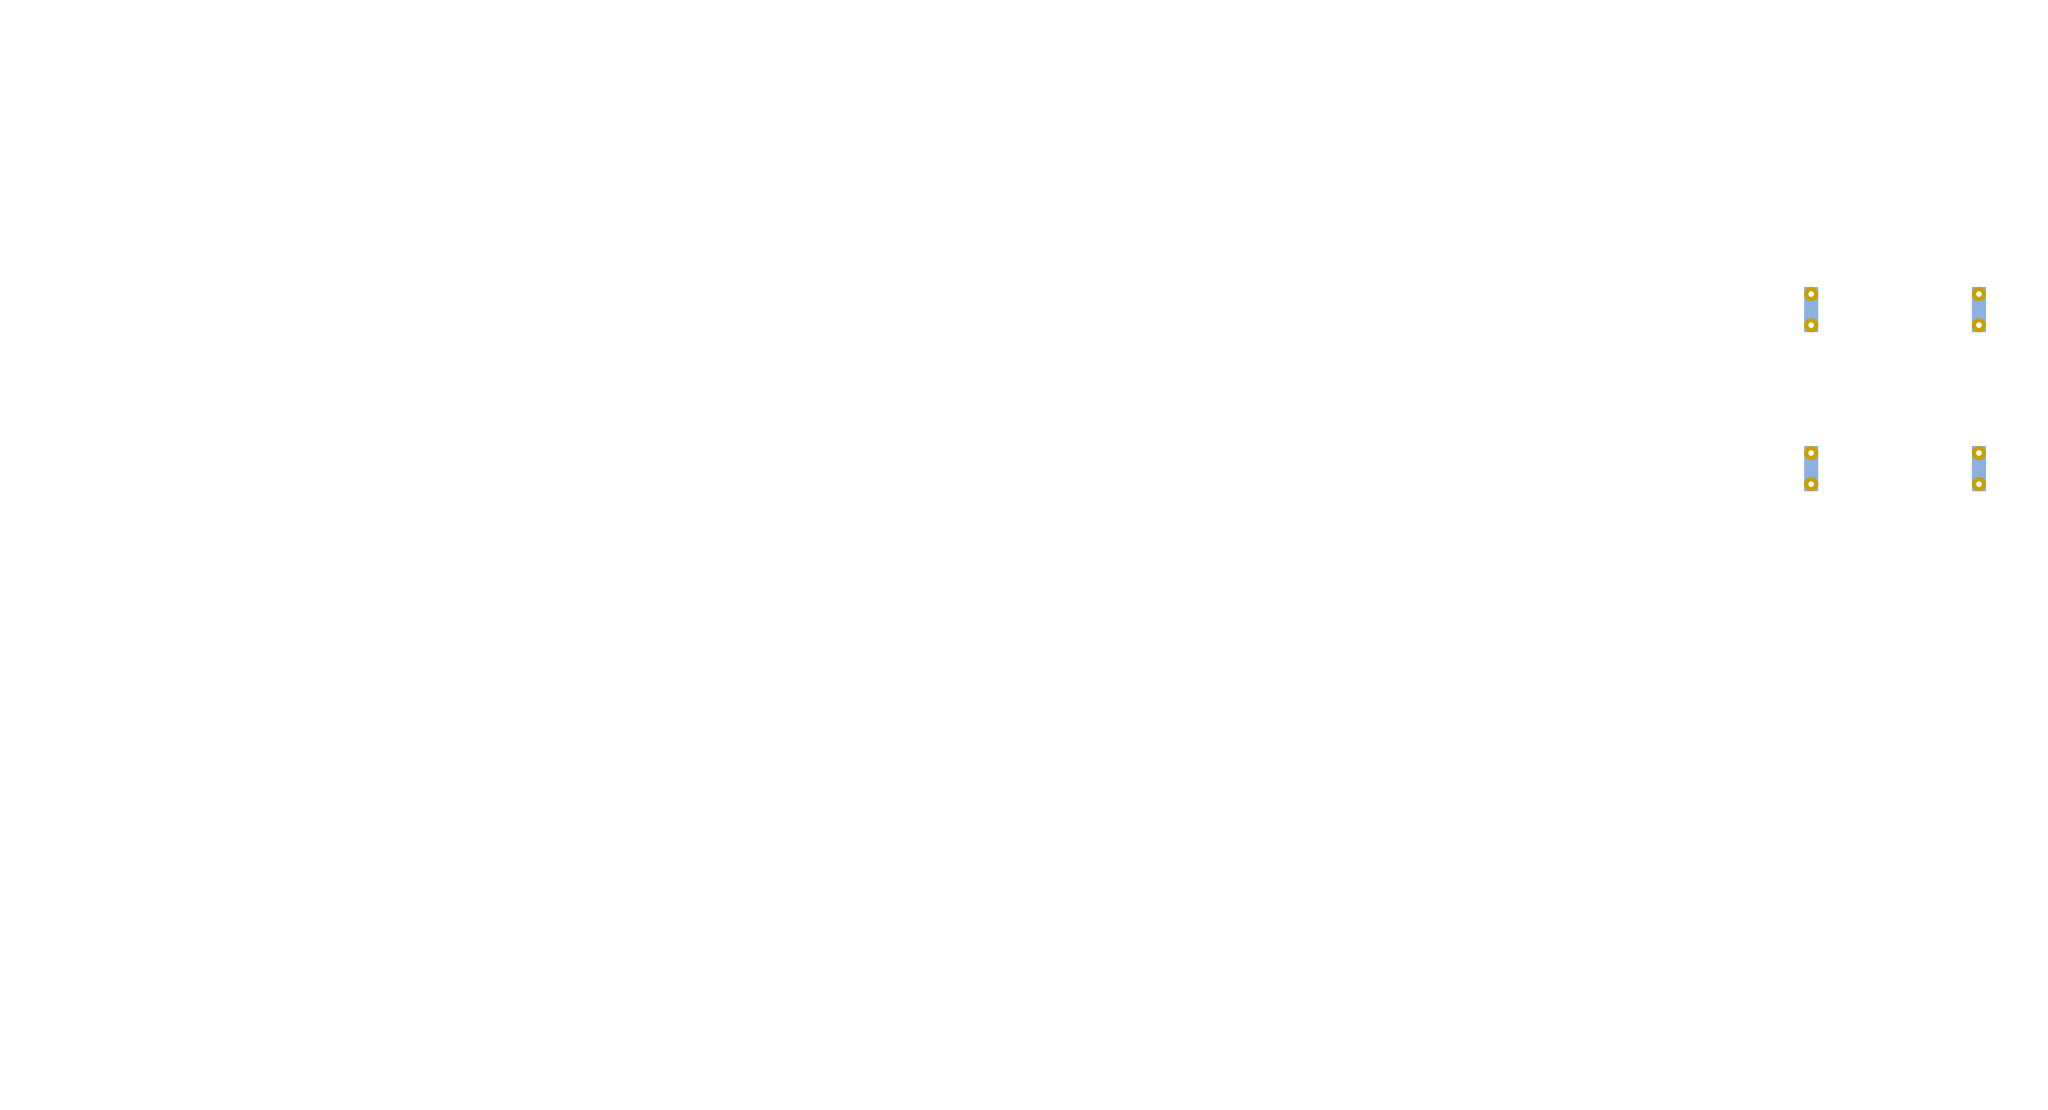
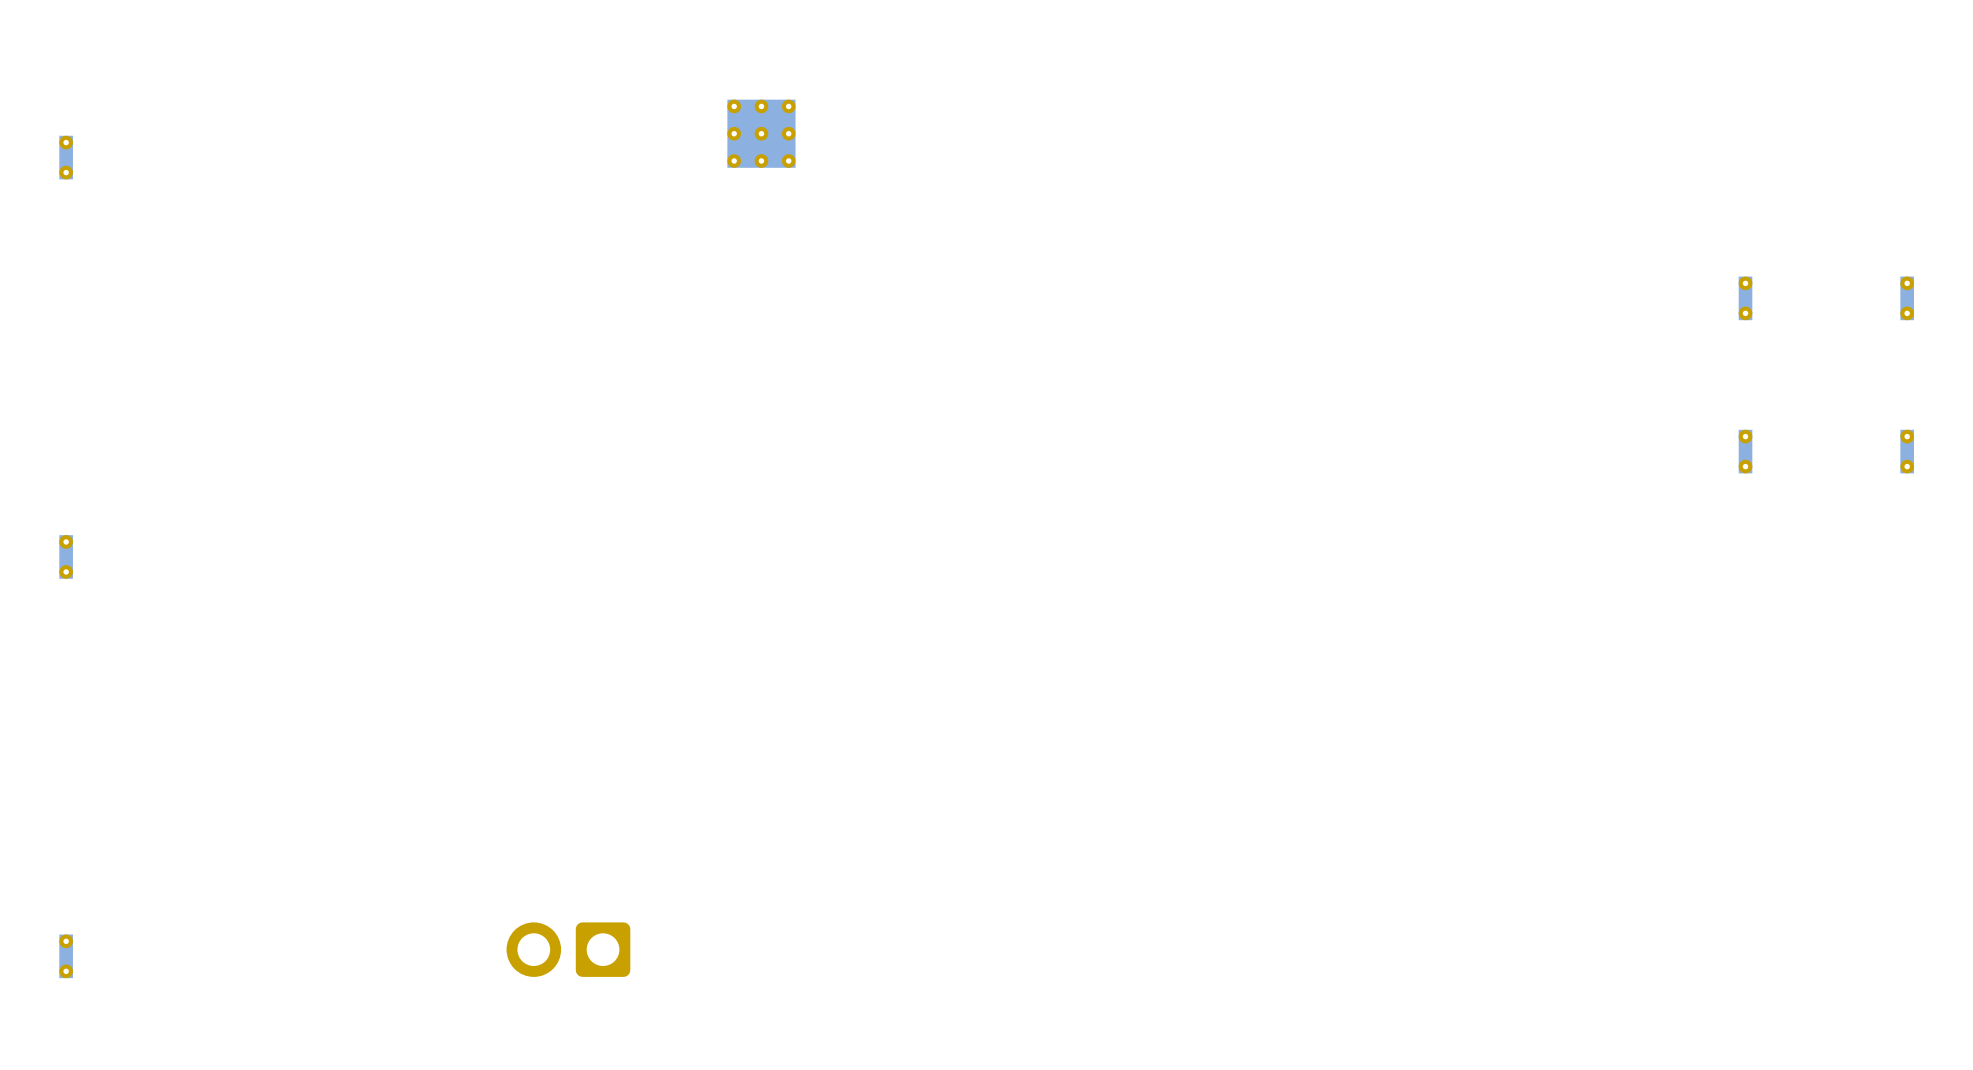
part: none -> (761, 133)
part: none -> (66, 157)
part: none -> (66, 556)
part: none -> (568, 949)
part: none -> (66, 956)

